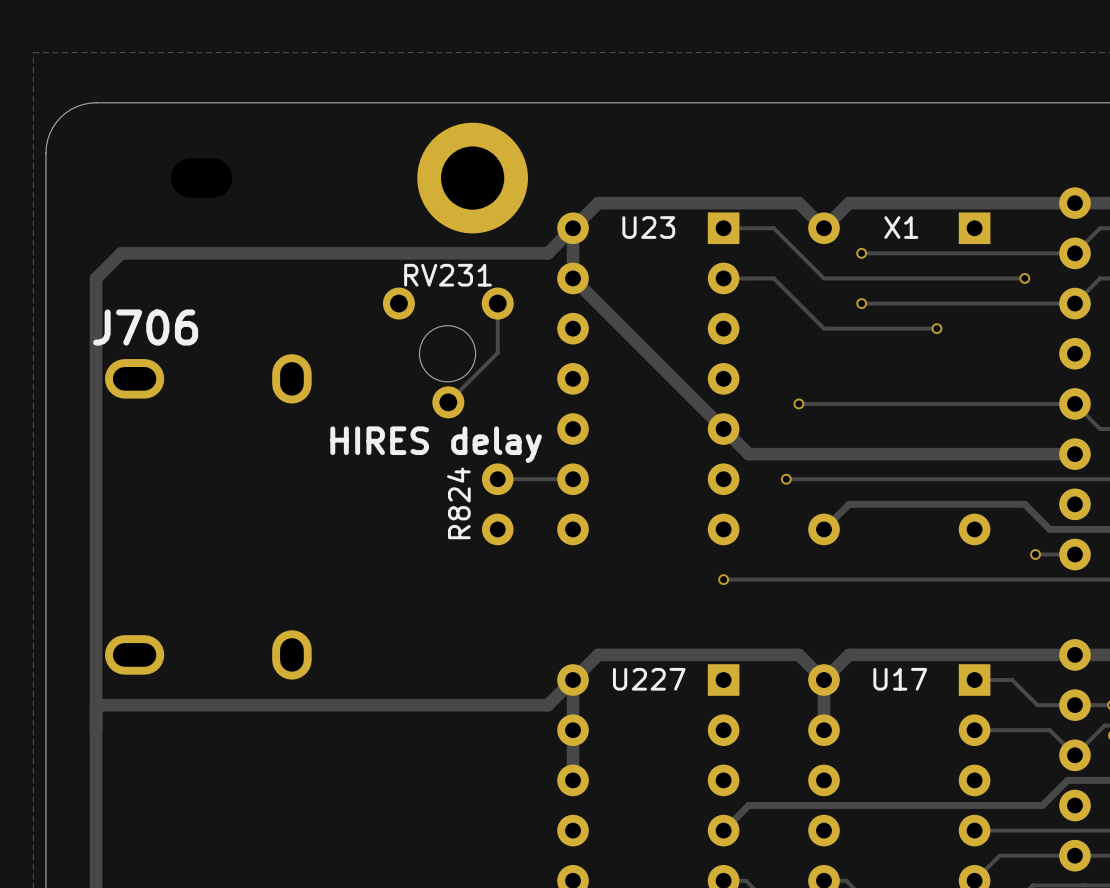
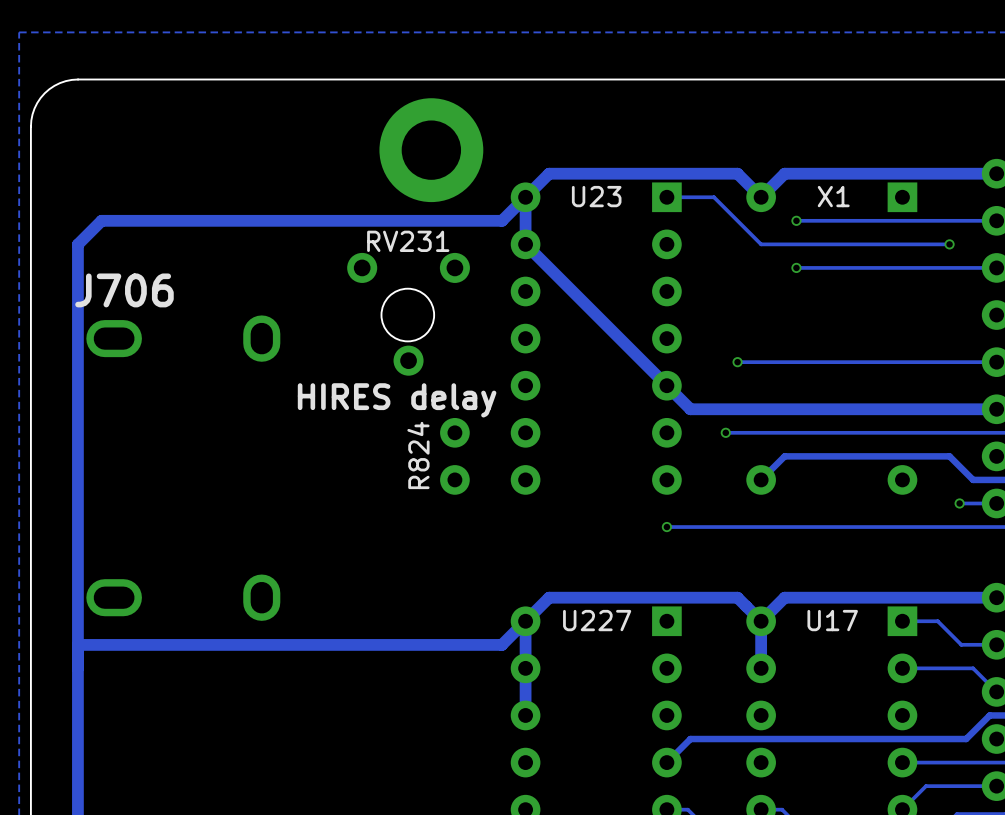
track: (723, 278) (773, 278) (824, 328) (936, 328) -> none
track: (497, 303) (497, 352) (448, 402) -> none
via: (936, 328) -> none
track: (573, 479) (497, 479) -> none

